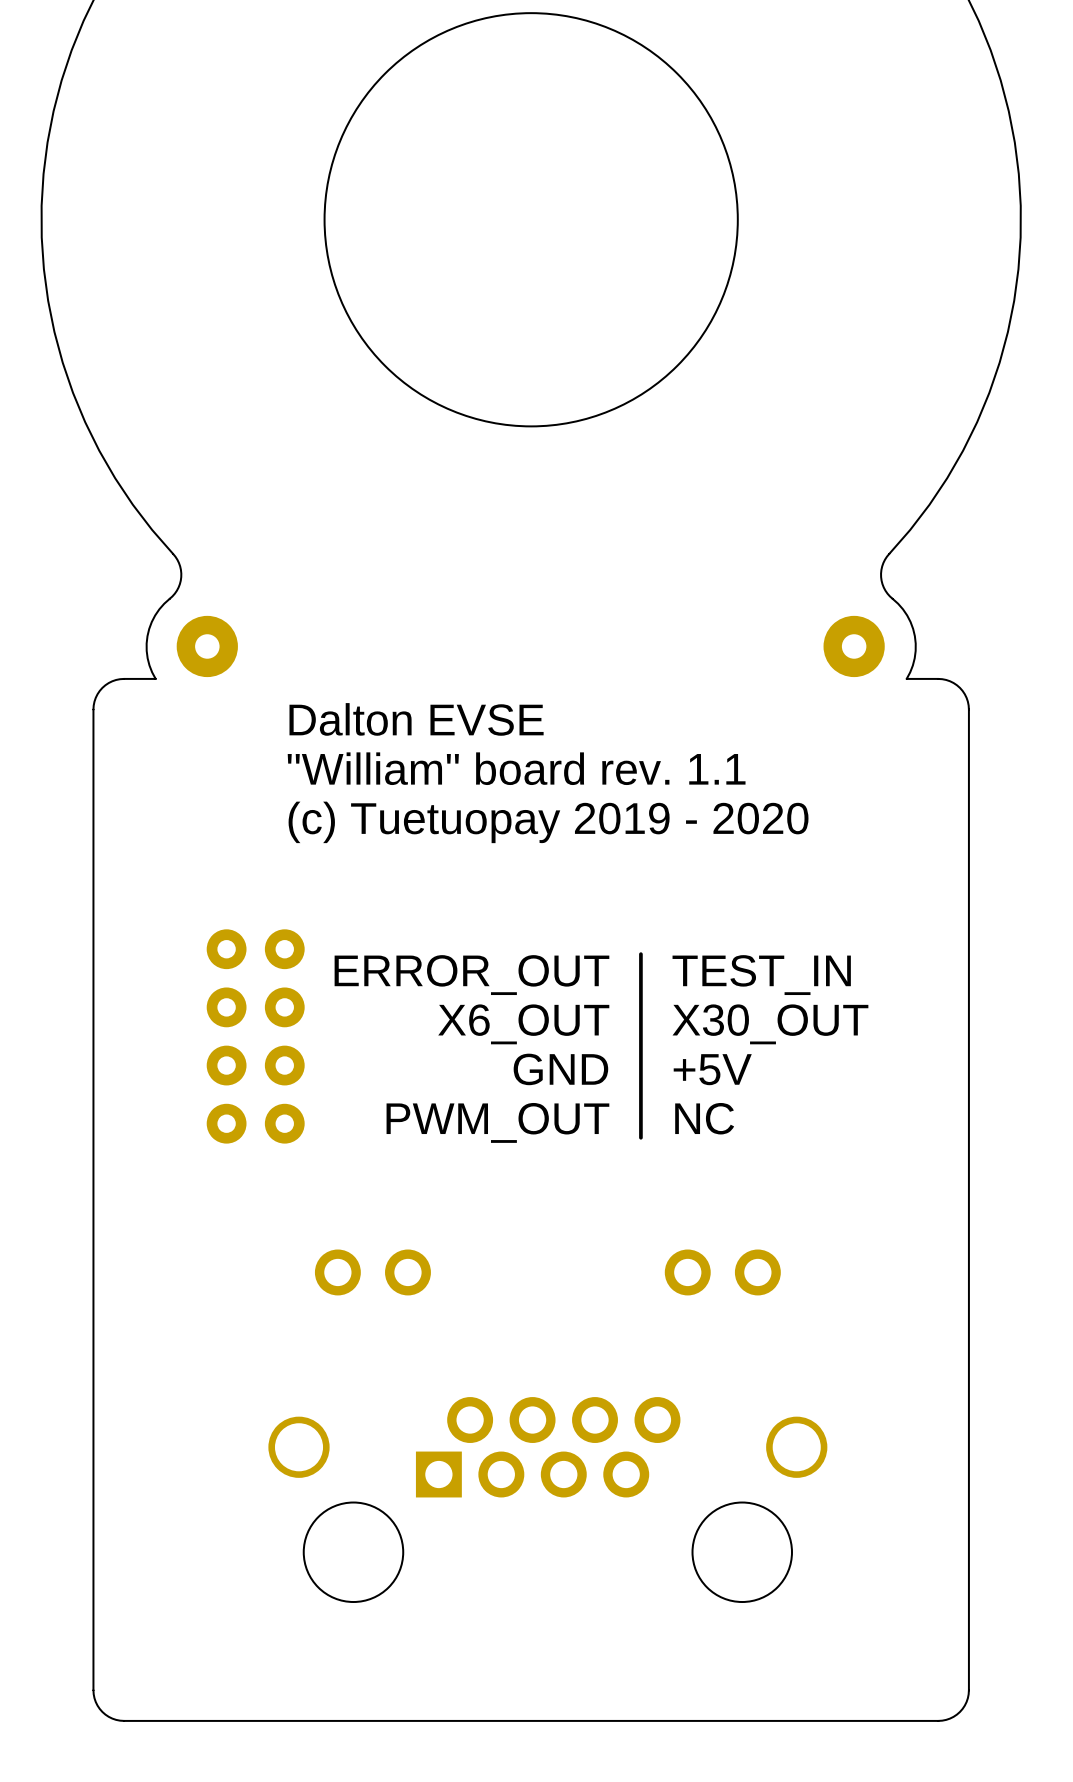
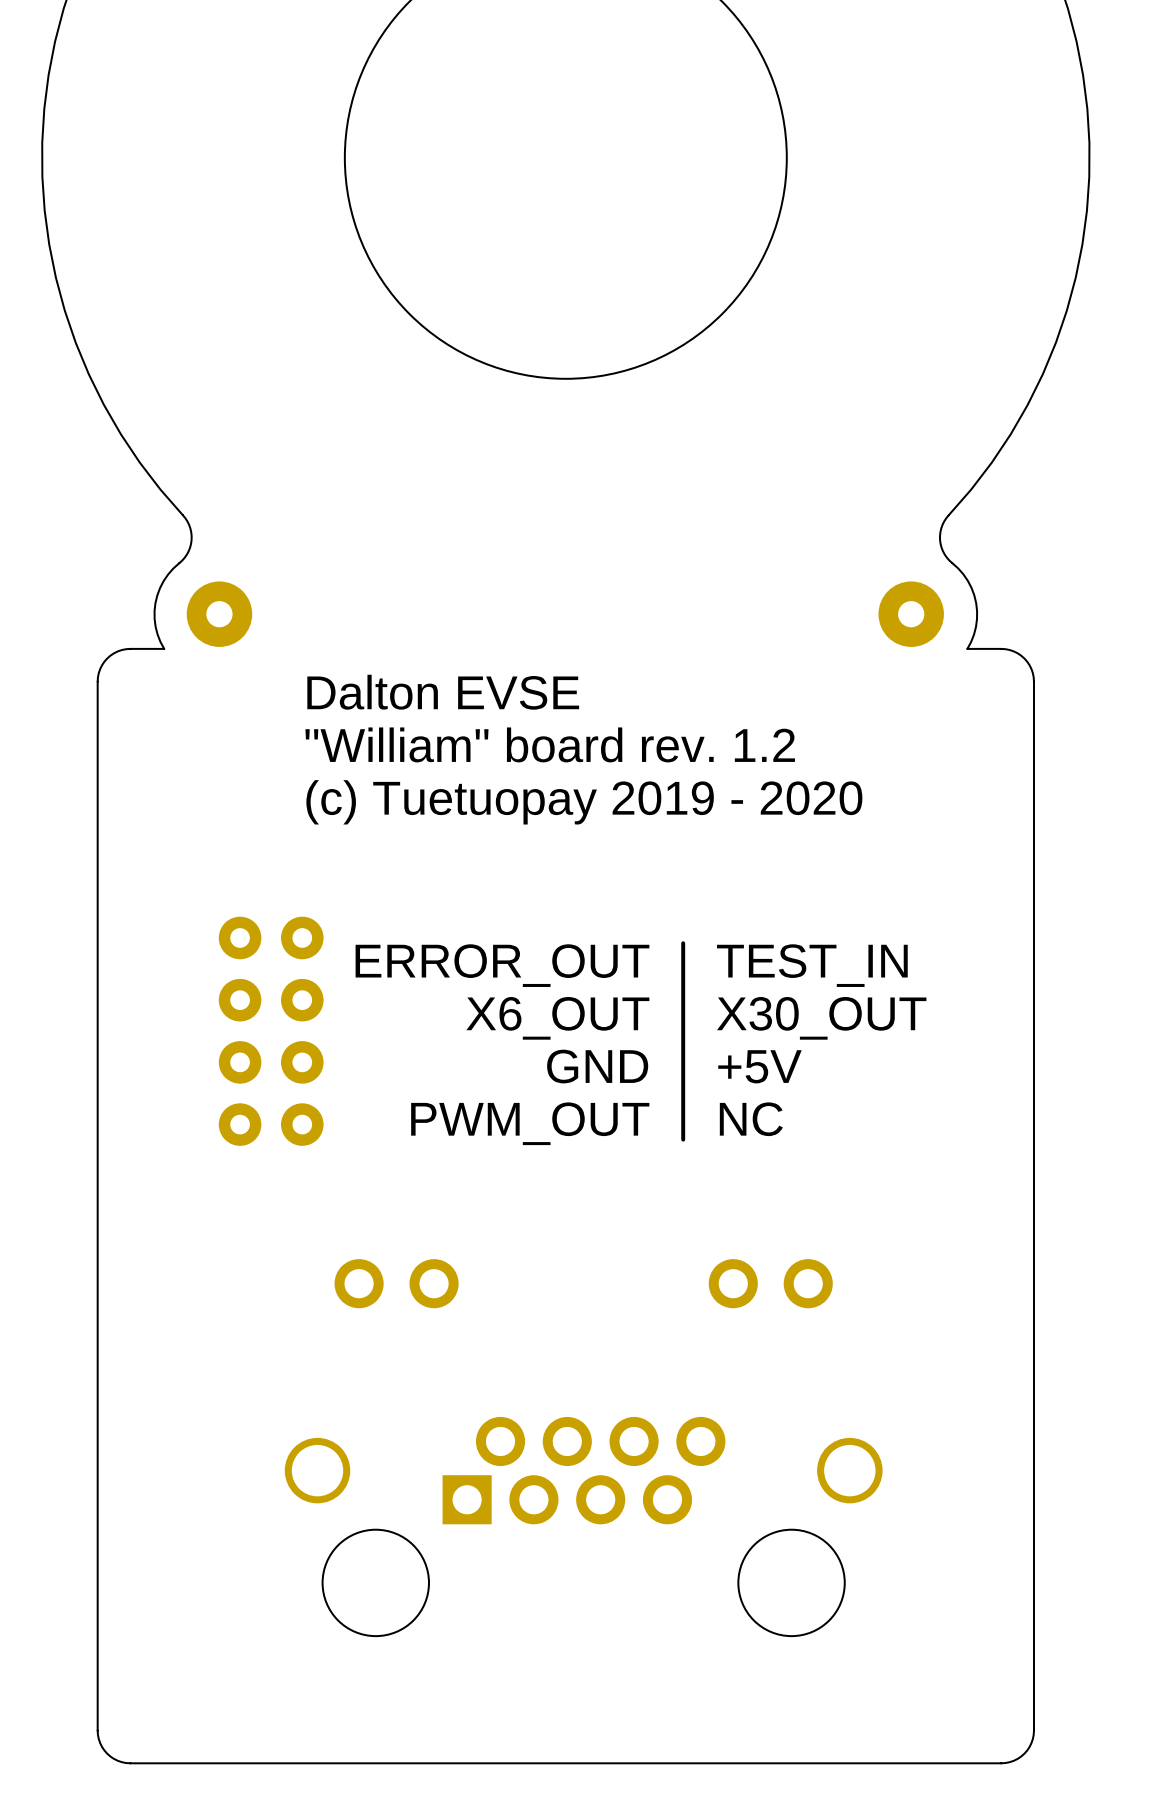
text: "William" board rev. 1.1 (516, 768) -> "William" board rev. 1.2 (550, 744)

